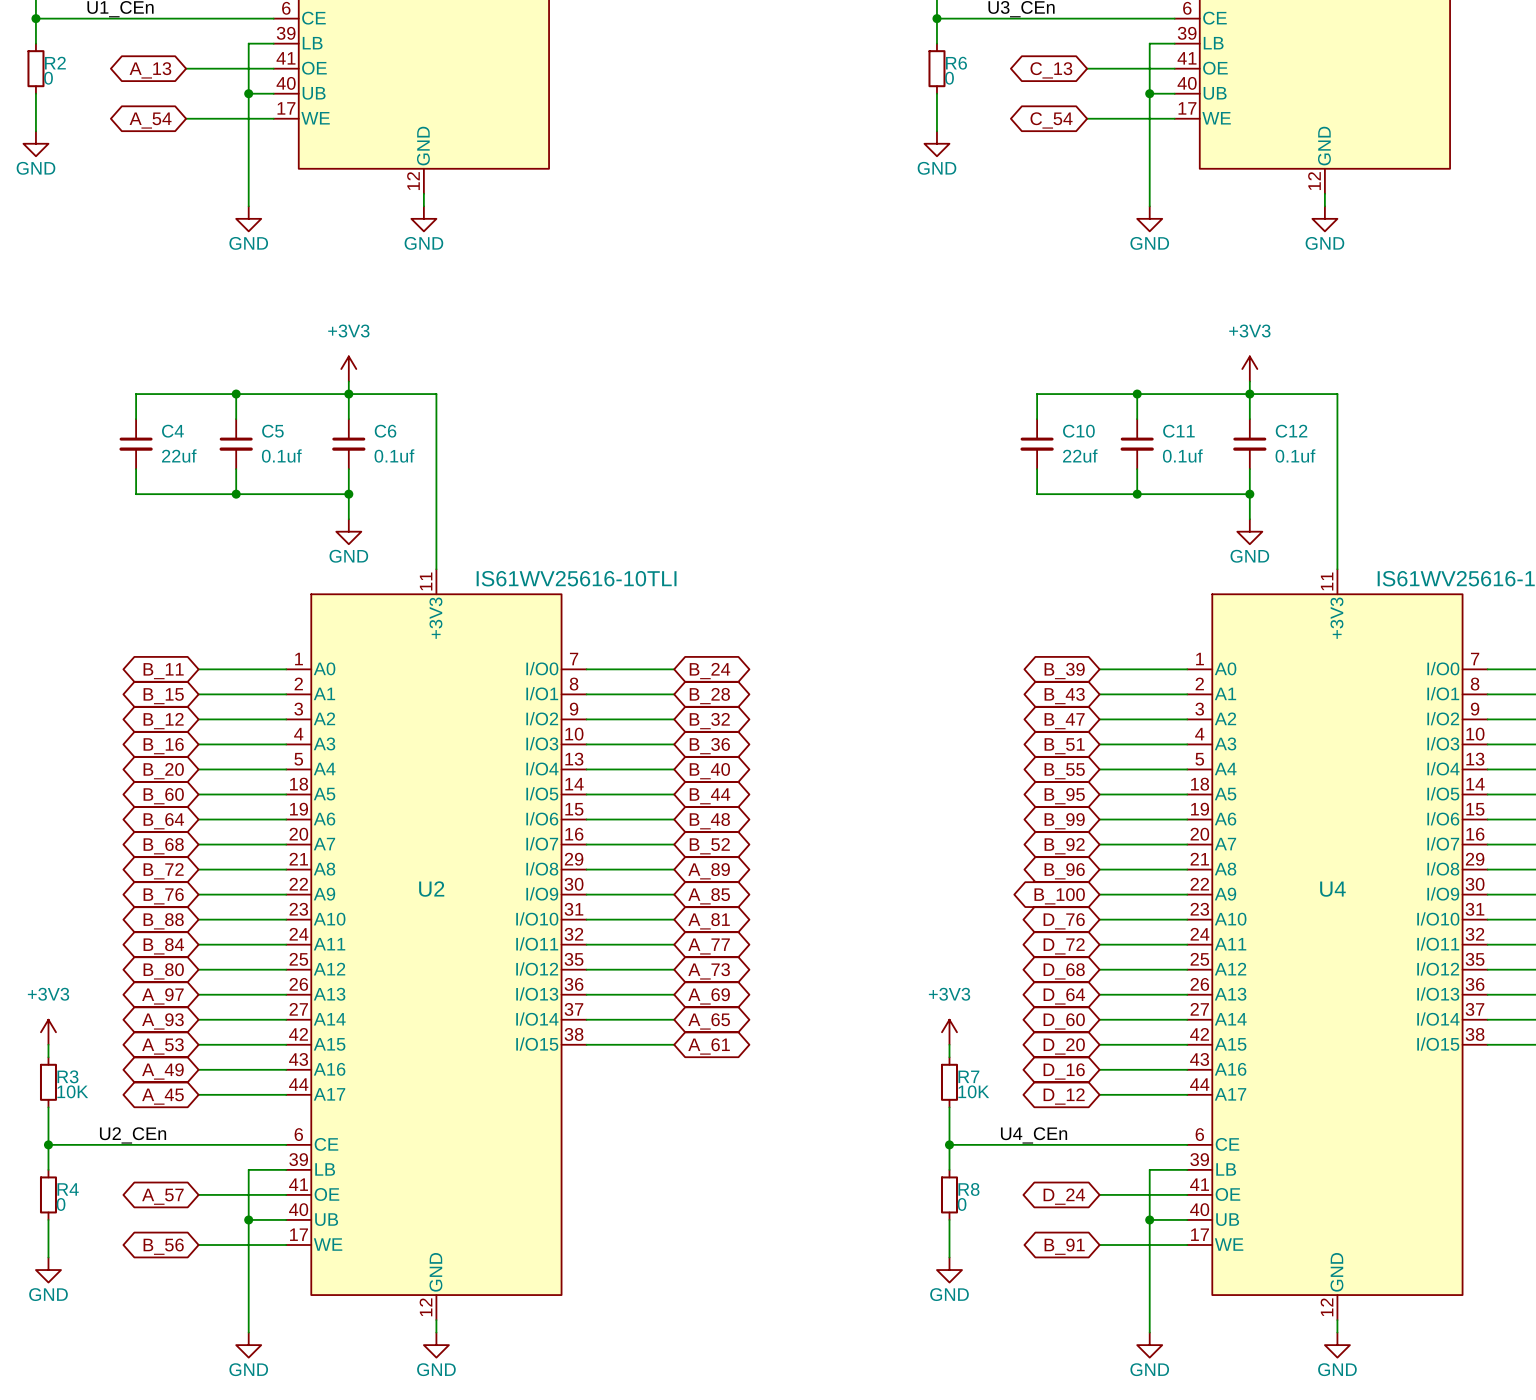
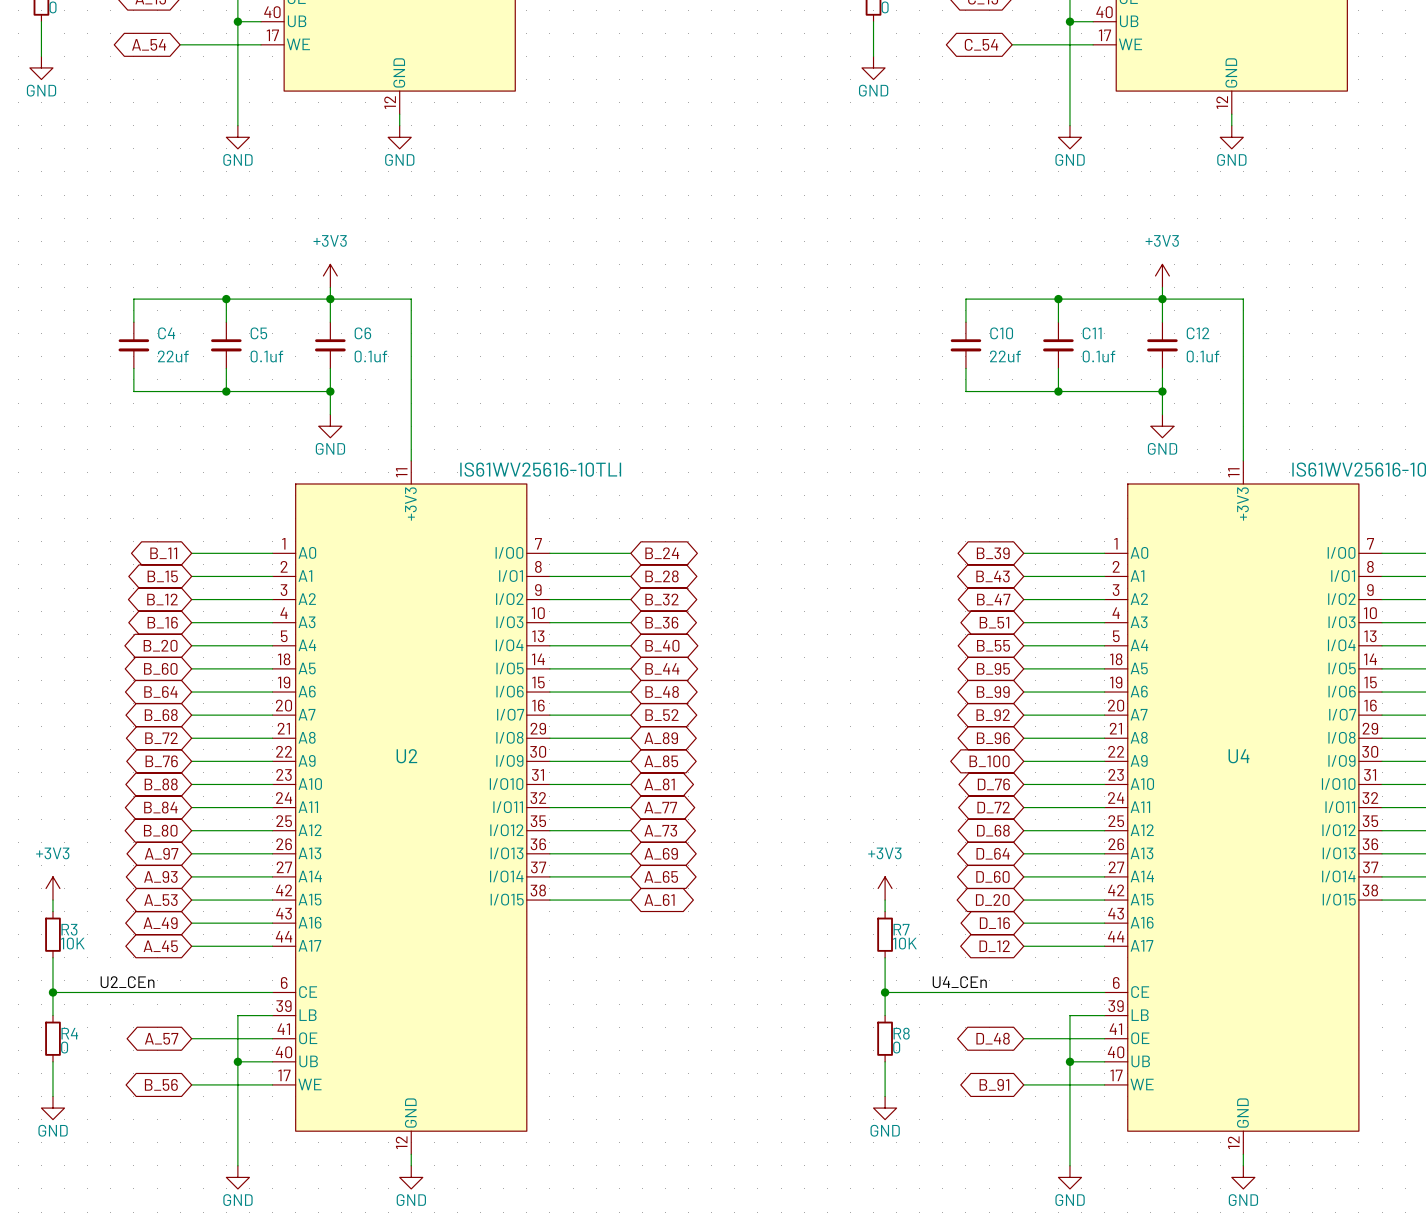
global label: D_24 (1064, 1196) -> D_48 (993, 1038)

